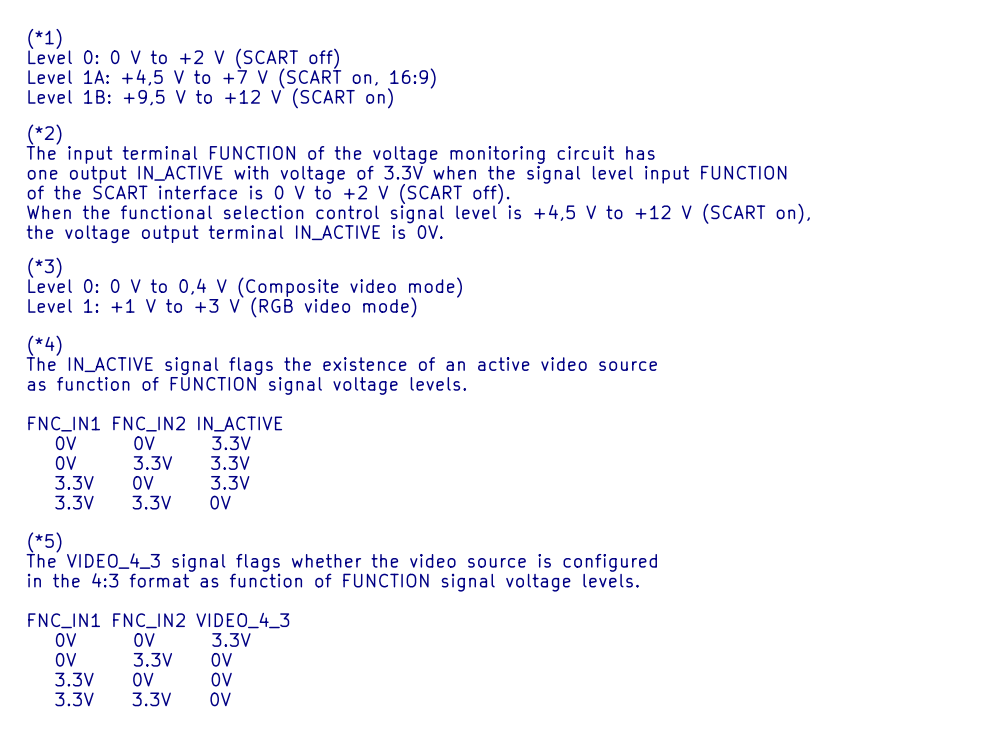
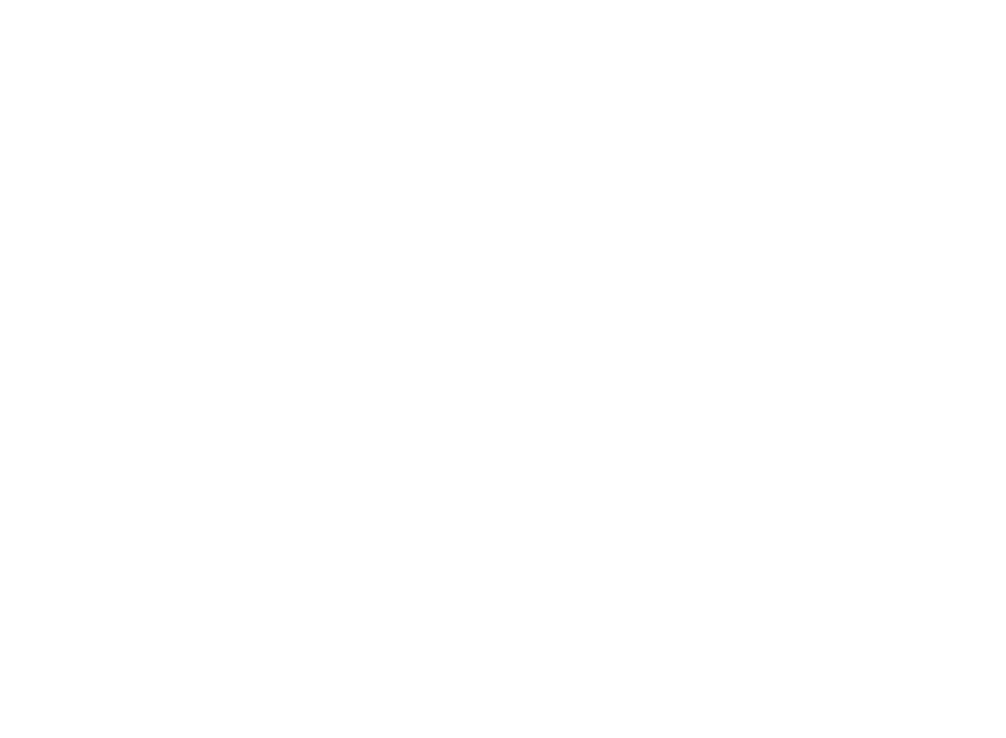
text: (*1) (44, 38) -> none
text: Level 0: 0 V to +2 V (SCART off) (183, 58) -> none
text: Level 1A: +4,5 V to +7 V (SCART on, 16:9) (231, 78) -> none
text: Level 1B: +9,5 V to +12 V (SCART on) (210, 98) -> none
text: (*2) (44, 134) -> none
text: The input terminal FUNCTION of the voltage monitoring circuit has (340, 154) -> none
text: one output IN_ACTIVE with voltage of 3.3V when the signal level input FUNCTION (407, 174) -> none
text: of the SCART interface is 0 V to +2 V (SCART off). (268, 193) -> none
text: When the functional selection control signal level is +4,5 V to +12 V (SCART on), (418, 213) -> none
text: the voltage output terminal IN_ACTIVE is 0V. (234, 234) -> none
text: (*3) (44, 267) -> none
text: Level 0: 0 V to 0,4 V (Composite video mode) (245, 287) -> none
text: Level 1: +1 V to +3 V (RGB video mode) (222, 307) -> none
text: (*4) (44, 345) -> none
text: The IN_ACTIVE signal flags the existence of an active video source (341, 366) -> none
text: as function of FUNCTION signal voltage levels. (246, 385) -> none
text: FNC_IN1 FNC_IN2 IN_ACTIVE (155, 424) -> none
text: 0V 0V 3.3V (153, 443) -> none
text: 0V 3.3V 3.3V (152, 463) -> none
text: 3.3V 0V 3.3V (152, 482) -> none
text: 3.3V 3.3V 0V (142, 502) -> none
text: (*5) (44, 542) -> none
text: The VIDEO_4_3 signal flags whether the video source is configured (341, 562) -> none
text: in the 4:3 format as function of FUNCTION signal voltage levels. (333, 582) -> none
text: FNC_IN1 FNC_IN2 VIDEO_4_3 (158, 620) -> none
text: 0V 0V 3.3V (153, 639) -> none
text: 0V 3.3V 0V (143, 659) -> none
text: 3.3V 0V 0V (143, 679) -> none
text: 3.3V 3.3V 0V (142, 699) -> none

